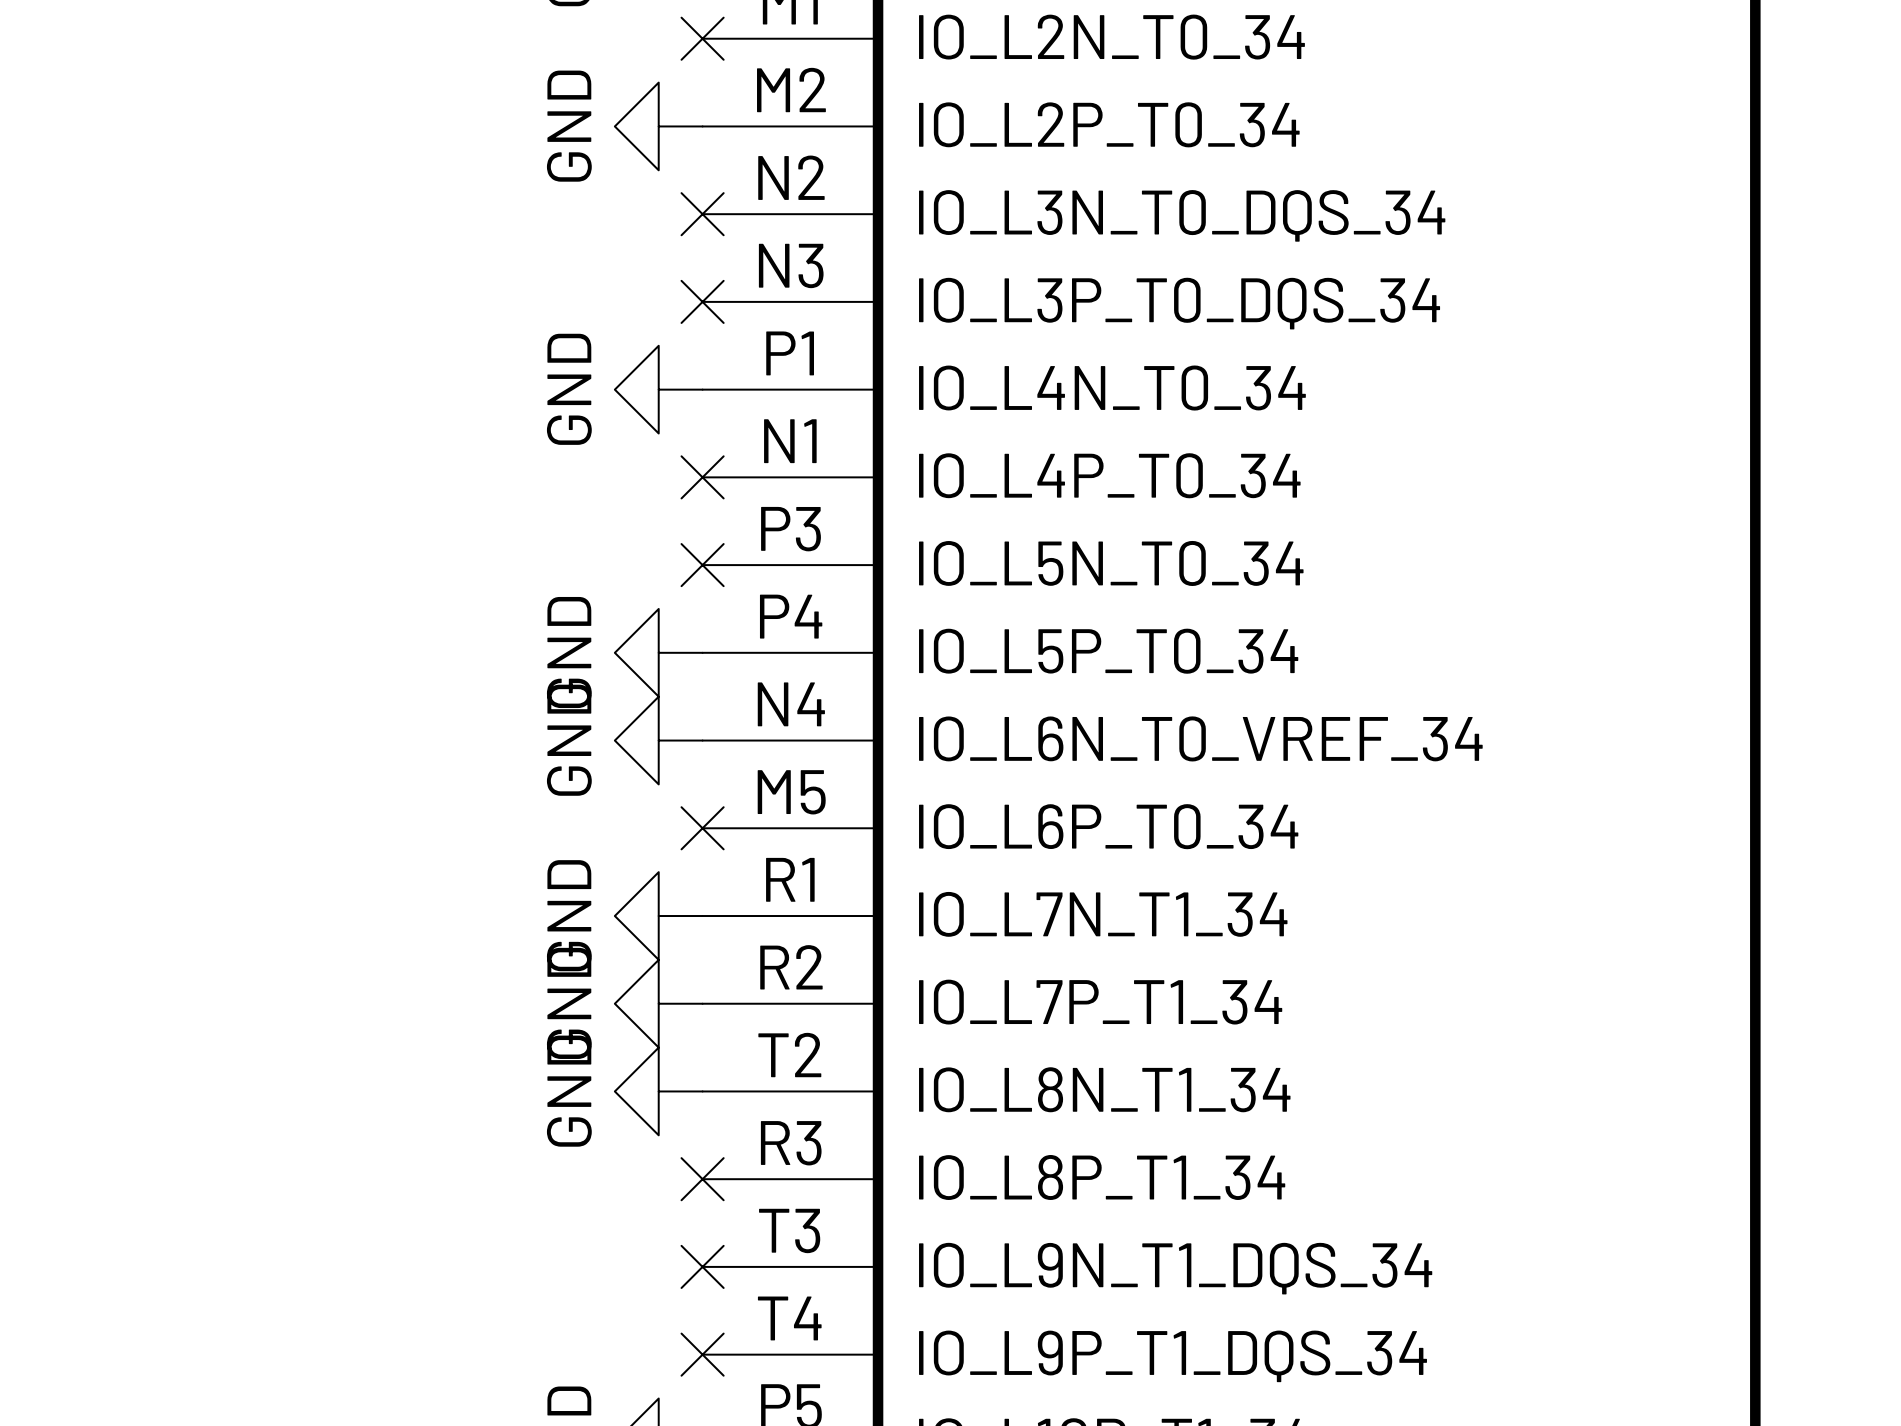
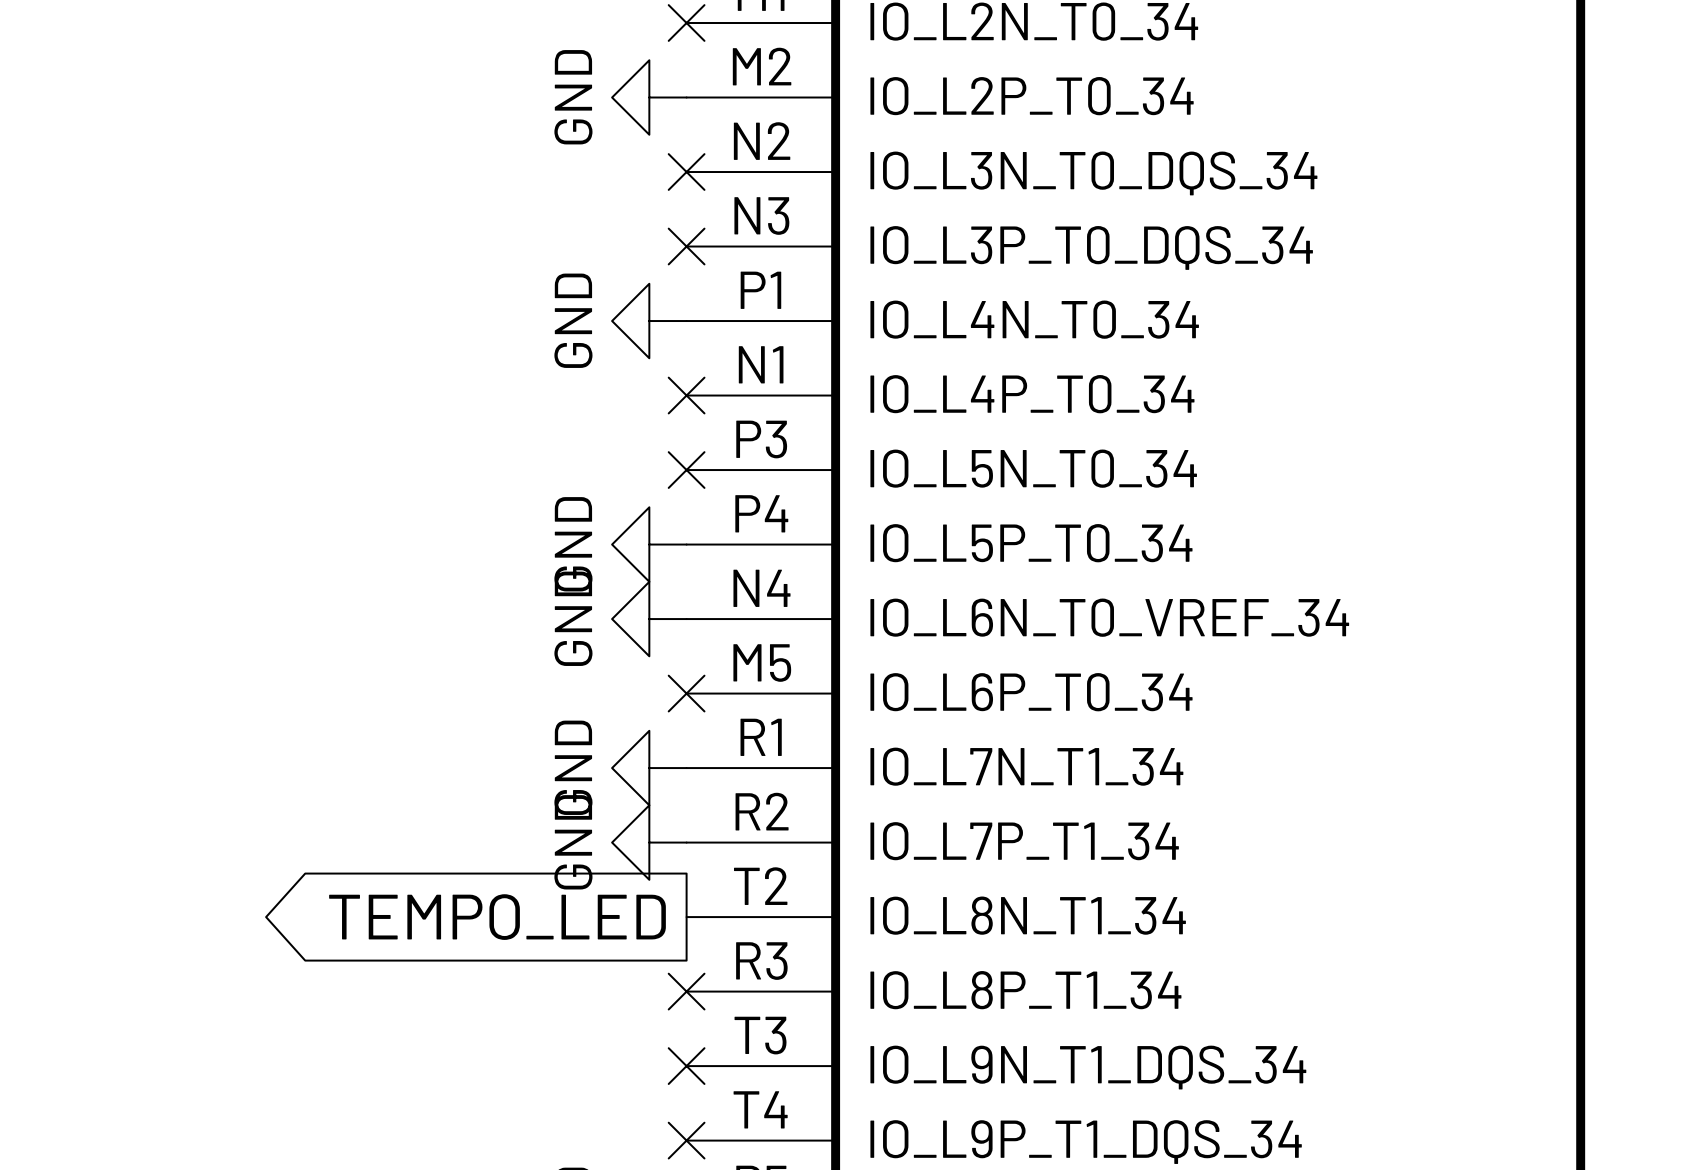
global label: none -> TEMPO_LED (497, 917)
power symbol: GND (658, 1091) -> none

